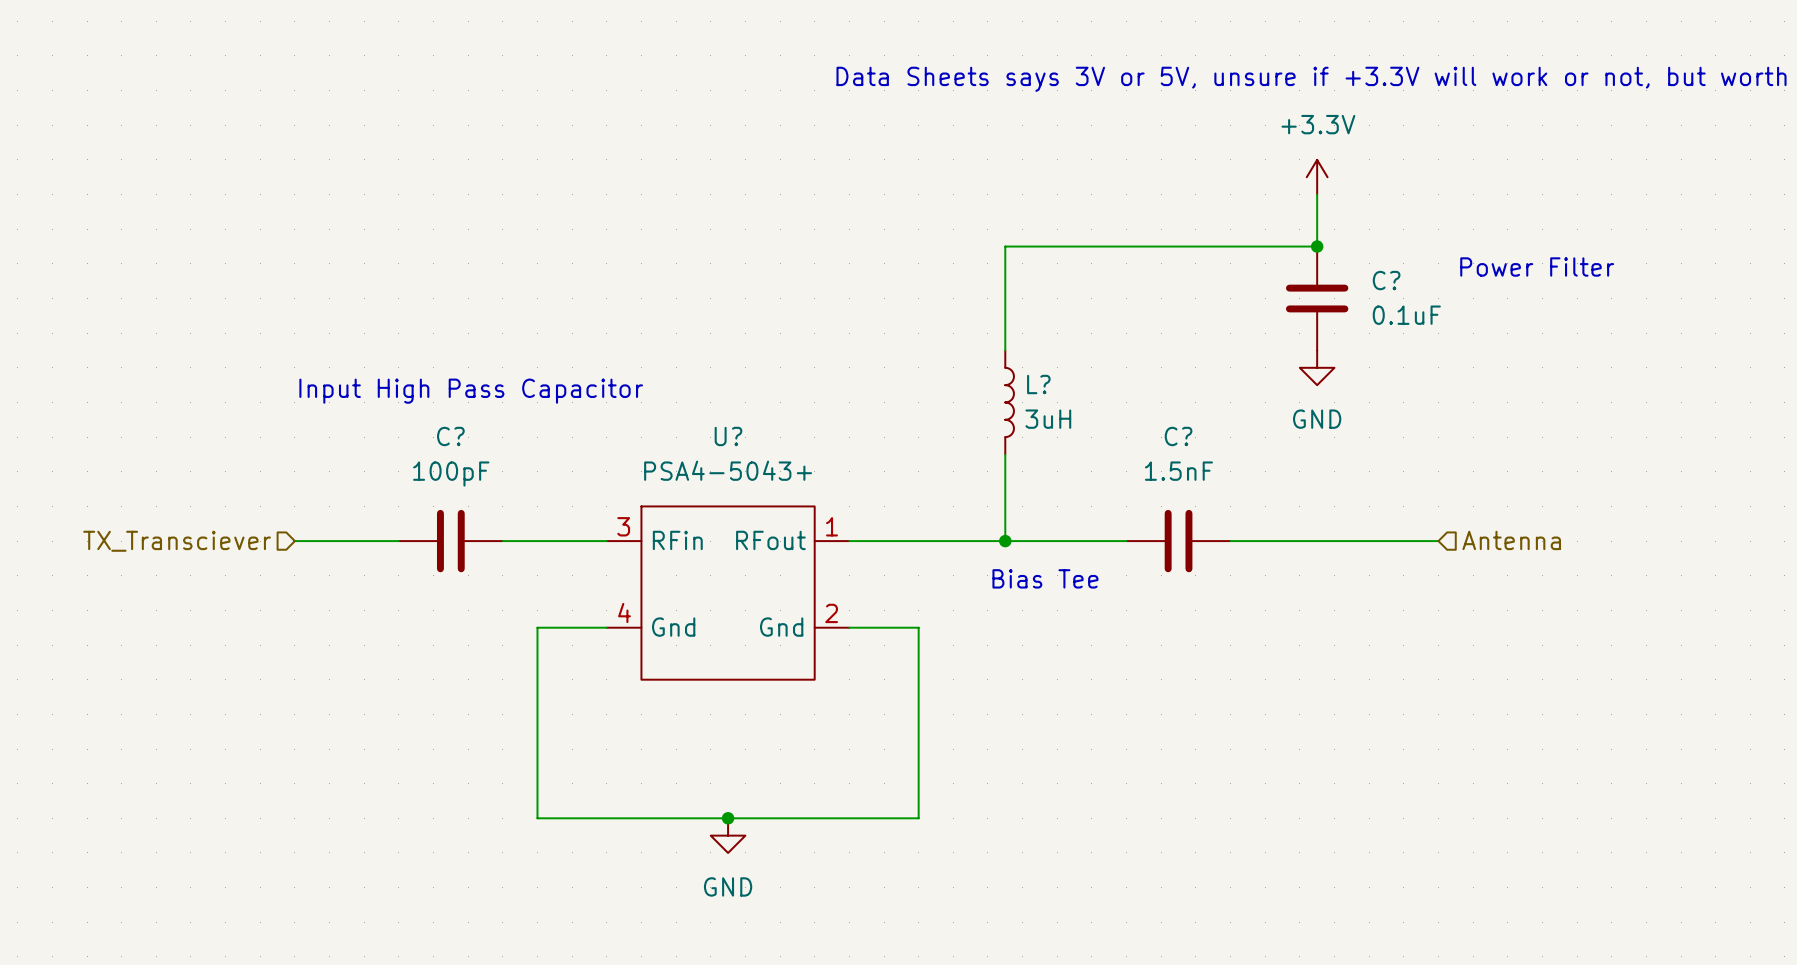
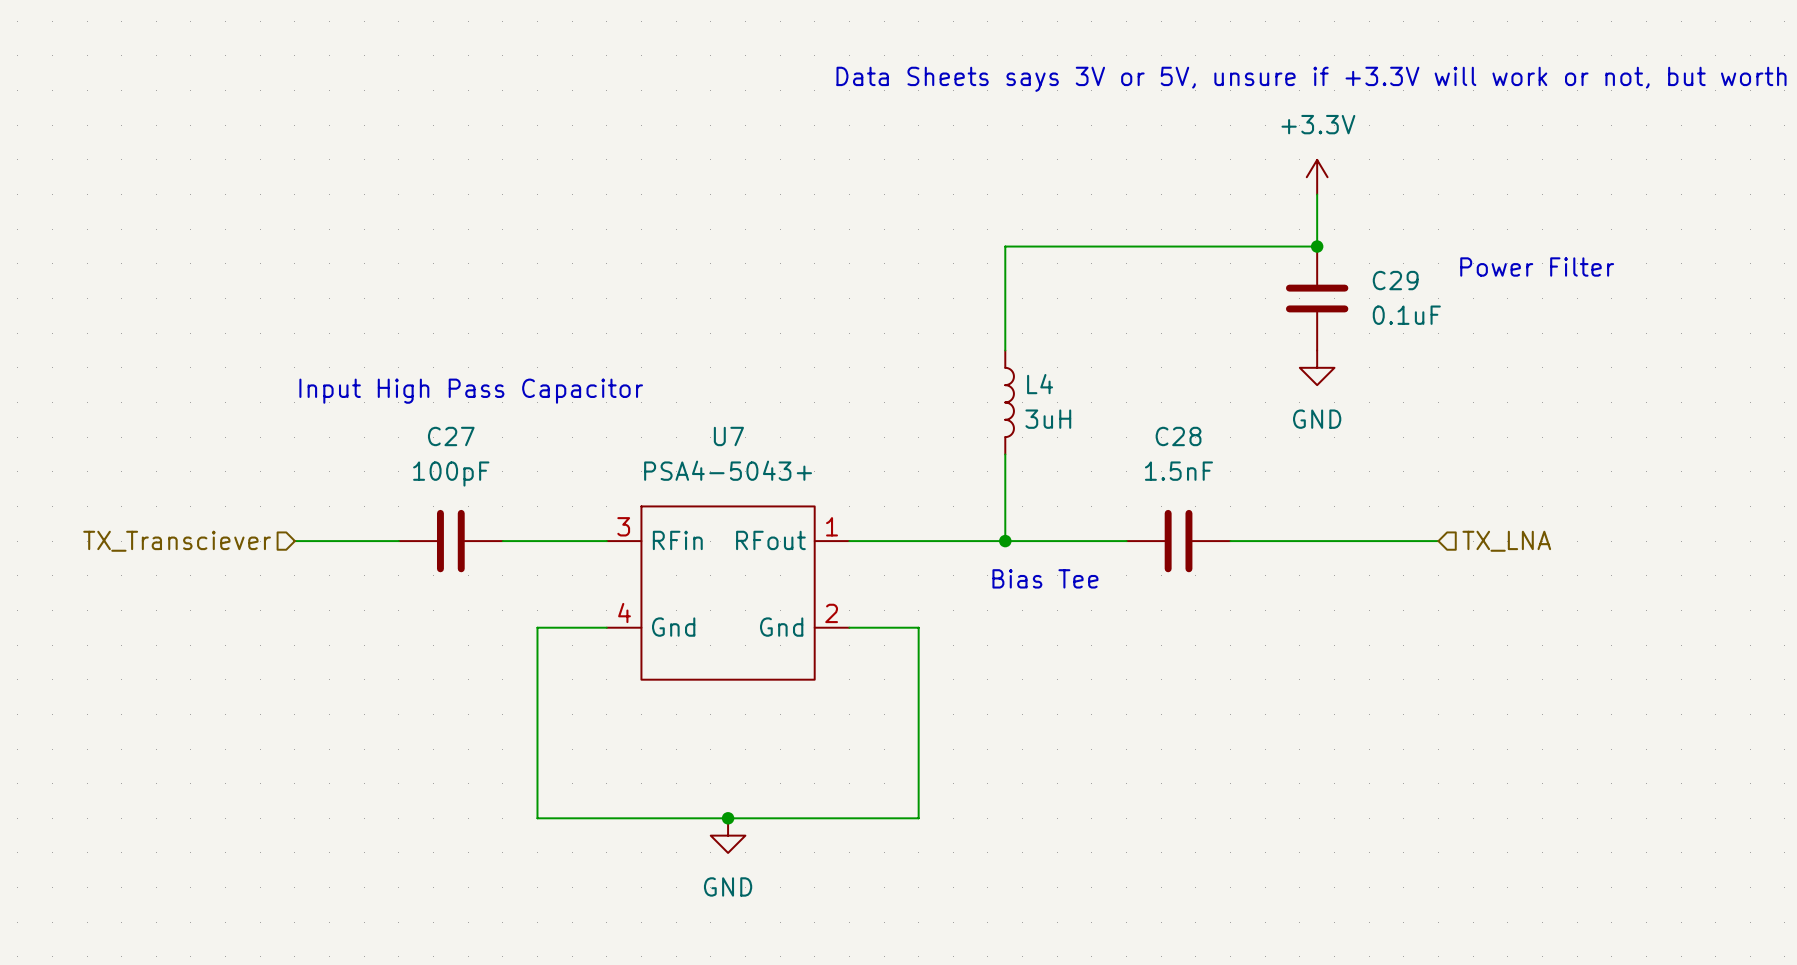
C? name: C? (1386, 280) -> C29 (1395, 280)
L? name: L? (1038, 384) -> L4 (1040, 384)
C? name: C? (450, 436) -> C27 (451, 436)
U? name: U? (728, 436) -> U7 (728, 436)
C? name: C? (1178, 436) -> C28 (1178, 436)
hierarchical label: Antenna (1511, 540) -> TX_LNA (1506, 541)

